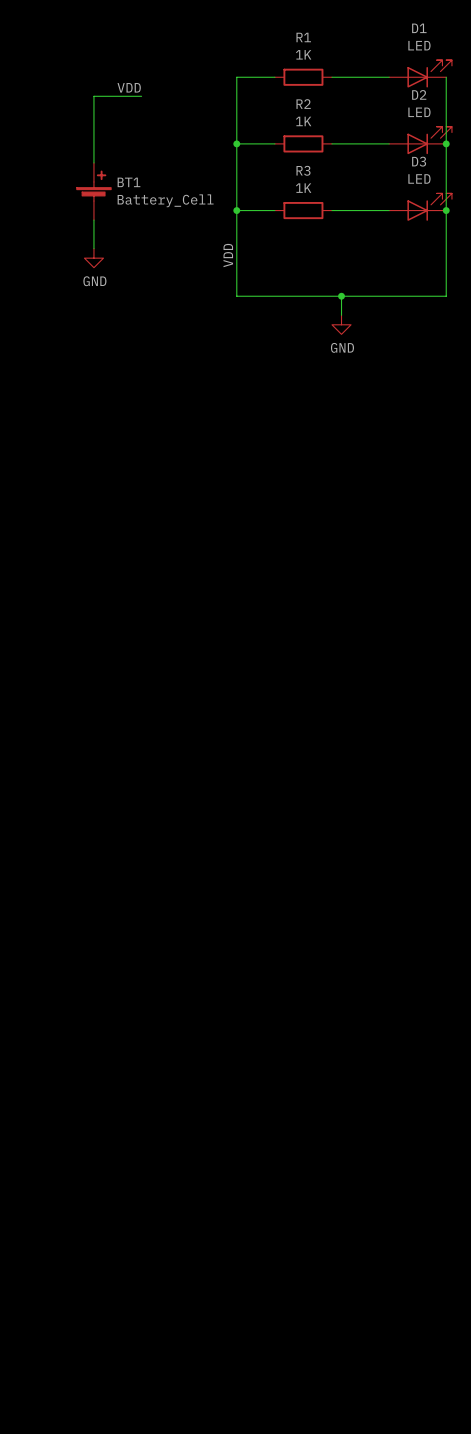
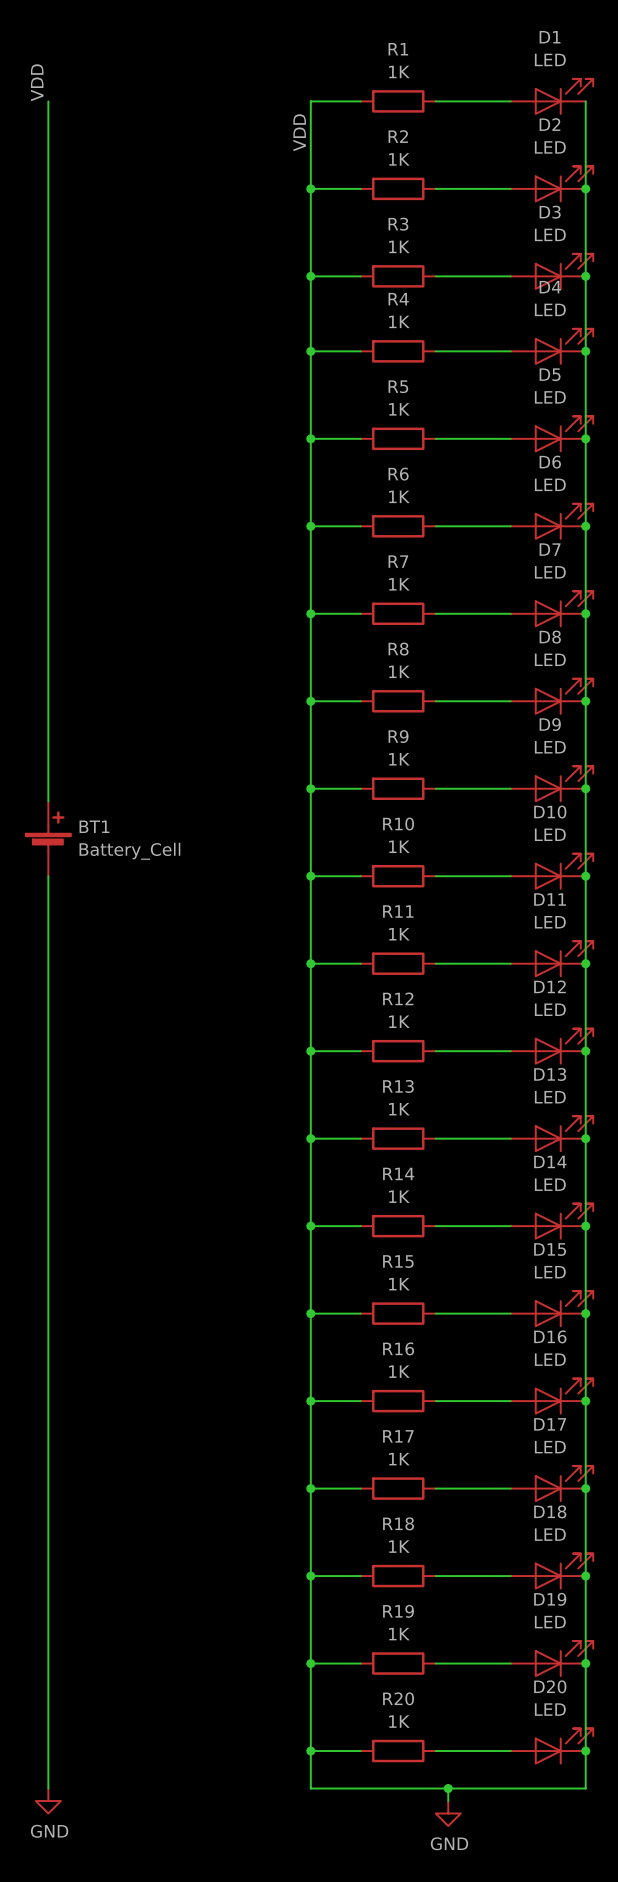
label: none -> VDD (37, 82)
wire: none -> (48, 101) (48, 801)
label: VDD (129, 87) -> none
wire: (141, 96) (93, 96) (93, 162) -> none
label: none -> VDD (299, 132)
BT1 position: (93, 191) -> (48, 838)
wire: (93, 220) (93, 248) -> none
label: VDD (228, 255) -> none
power symbol: GND (93, 258) -> none
D4: none -> LED (551, 346)
wire: none -> (310, 351) (360, 351)
junction: none -> (310, 351)
R4: none -> 1K (398, 351)
wire: none -> (435, 351) (510, 351)
junction: none -> (585, 351)
wire: (236, 296) (446, 296) -> (310, 388) (310, 1788) (585, 1788) (585, 388)
wire: (341, 296) (341, 315) -> none
junction: (341, 296) -> none
power symbol: GND (341, 324) -> none
D5: none -> LED (551, 434)
wire: none -> (310, 438) (360, 438)
junction: none -> (310, 438)
R5: none -> 1K (398, 438)
wire: none -> (435, 438) (510, 438)
junction: none -> (585, 438)
D6: none -> LED (551, 521)
wire: none -> (310, 526) (360, 526)
junction: none -> (310, 526)
R6: none -> 1K (398, 526)
wire: none -> (435, 526) (510, 526)
junction: none -> (585, 526)
D7: none -> LED (551, 609)
wire: none -> (310, 613) (360, 613)
junction: none -> (310, 613)
R7: none -> 1K (398, 613)
wire: none -> (435, 613) (510, 613)
junction: none -> (585, 613)
D8: none -> LED (551, 696)
wire: none -> (310, 701) (360, 701)
junction: none -> (310, 701)
R8: none -> 1K (398, 701)
wire: none -> (435, 701) (510, 701)
junction: none -> (585, 701)
D9: none -> LED (551, 784)
wire: none -> (310, 788) (360, 788)
junction: none -> (310, 788)
R9: none -> 1K (398, 788)
wire: none -> (435, 788) (510, 788)
junction: none -> (585, 788)
D10: none -> LED (551, 871)
wire: none -> (48, 876) (48, 1788)
wire: none -> (310, 876) (360, 876)
junction: none -> (310, 876)
R10: none -> 1K (398, 876)
wire: none -> (435, 876) (510, 876)
junction: none -> (585, 876)
D11: none -> LED (551, 959)
wire: none -> (310, 963) (360, 963)
junction: none -> (310, 963)
R11: none -> 1K (398, 963)
wire: none -> (435, 963) (510, 963)
junction: none -> (585, 963)
D12: none -> LED (551, 1046)
wire: none -> (310, 1051) (360, 1051)
junction: none -> (310, 1051)
R12: none -> 1K (398, 1051)
wire: none -> (435, 1051) (510, 1051)
junction: none -> (585, 1051)
D13: none -> LED (551, 1134)
wire: none -> (310, 1138) (360, 1138)
junction: none -> (310, 1138)
R13: none -> 1K (398, 1138)
wire: none -> (435, 1138) (510, 1138)
junction: none -> (585, 1138)
D14: none -> LED (551, 1221)
wire: none -> (310, 1226) (360, 1226)
junction: none -> (310, 1226)
R14: none -> 1K (398, 1226)
wire: none -> (435, 1226) (510, 1226)
junction: none -> (585, 1226)
D15: none -> LED (551, 1309)
wire: none -> (310, 1313) (360, 1313)
junction: none -> (310, 1313)
R15: none -> 1K (398, 1313)
wire: none -> (435, 1313) (510, 1313)
junction: none -> (585, 1313)
D16: none -> LED (551, 1396)
wire: none -> (310, 1401) (360, 1401)
junction: none -> (310, 1401)
R16: none -> 1K (398, 1401)
wire: none -> (435, 1401) (510, 1401)
junction: none -> (585, 1401)
D17: none -> LED (551, 1484)
wire: none -> (310, 1488) (360, 1488)
junction: none -> (310, 1488)
R17: none -> 1K (398, 1488)
wire: none -> (435, 1488) (510, 1488)
junction: none -> (585, 1488)
D18: none -> LED (551, 1571)
wire: none -> (310, 1576) (360, 1576)
junction: none -> (310, 1576)
R18: none -> 1K (398, 1576)
wire: none -> (435, 1576) (510, 1576)
junction: none -> (585, 1576)
D19: none -> LED (551, 1659)
wire: none -> (310, 1663) (360, 1663)
junction: none -> (310, 1663)
R19: none -> 1K (398, 1663)
wire: none -> (435, 1663) (510, 1663)
junction: none -> (585, 1663)
D20: none -> LED (551, 1746)
wire: none -> (310, 1751) (360, 1751)
junction: none -> (310, 1751)
R20: none -> 1K (398, 1751)
wire: none -> (435, 1751) (510, 1751)
junction: none -> (585, 1751)
wire: none -> (448, 1788) (448, 1801)
junction: none -> (448, 1788)
power symbol: none -> GND (48, 1801)
power symbol: none -> GND (448, 1813)

